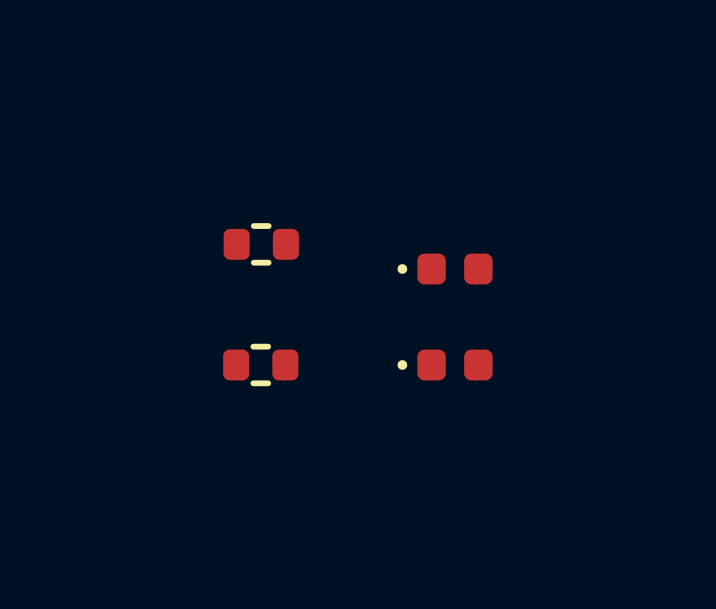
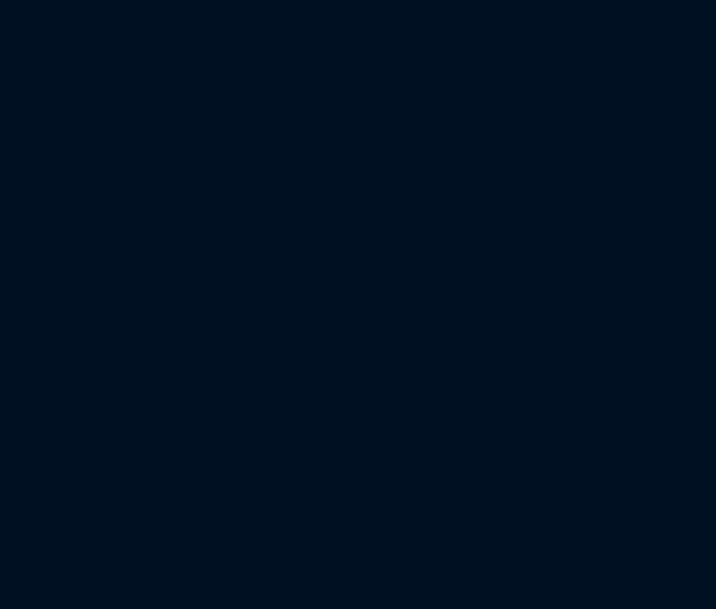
part: (261, 244) -> none
part: (445, 268) -> none
part: (260, 364) -> none
part: (445, 364) -> none

